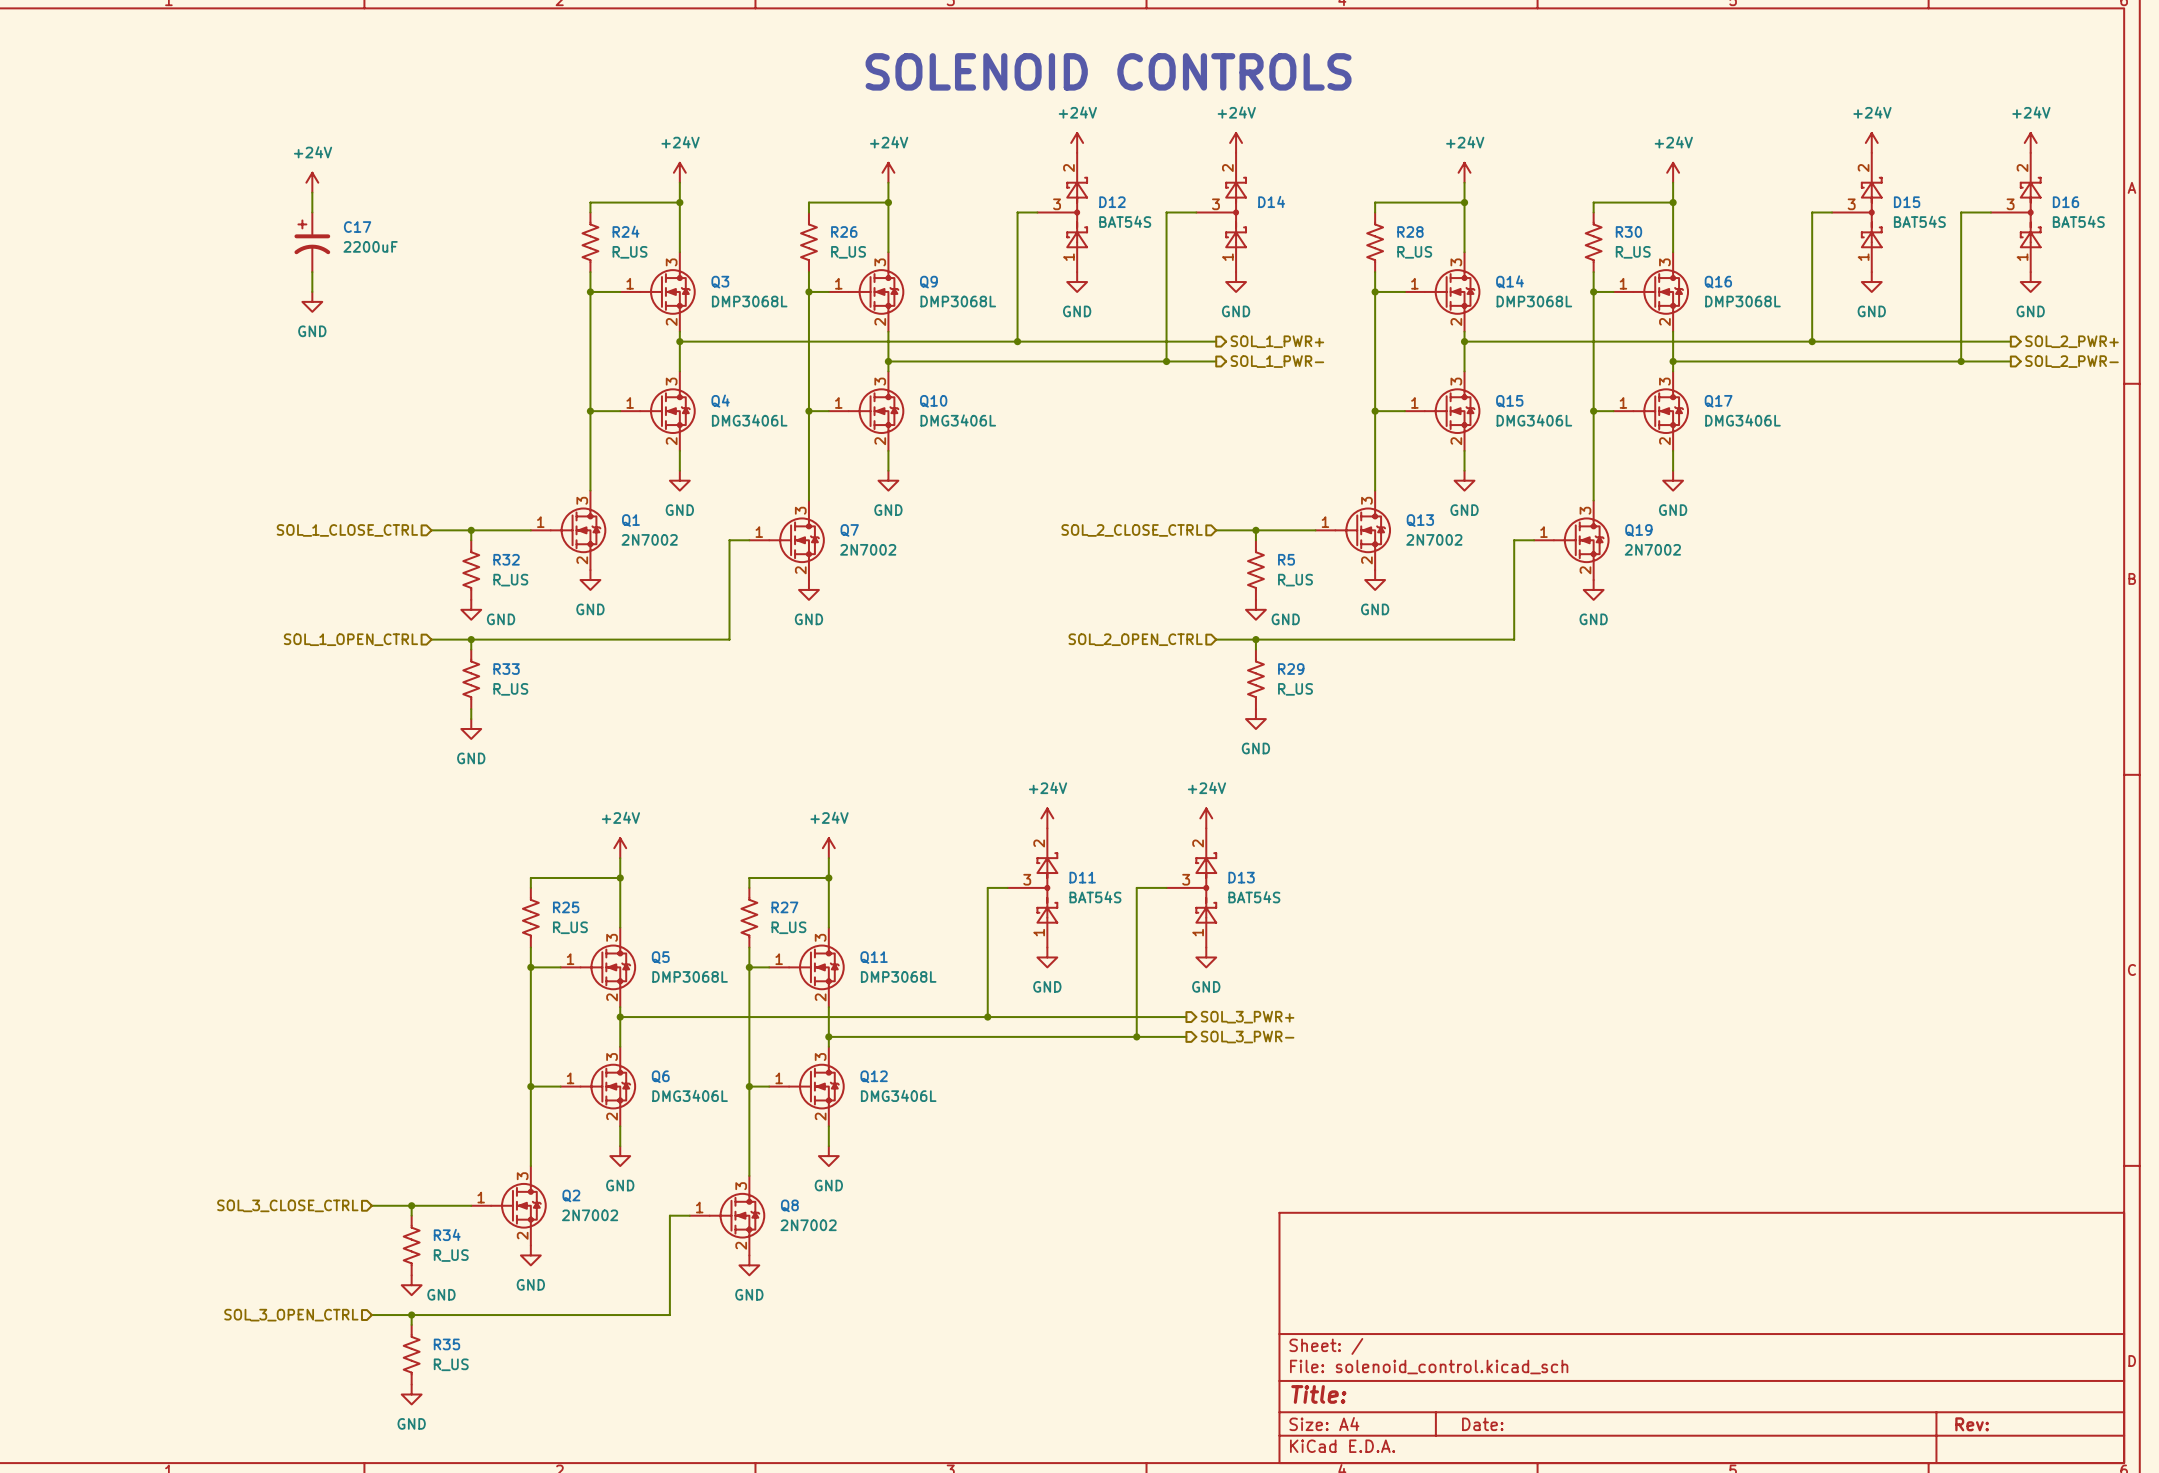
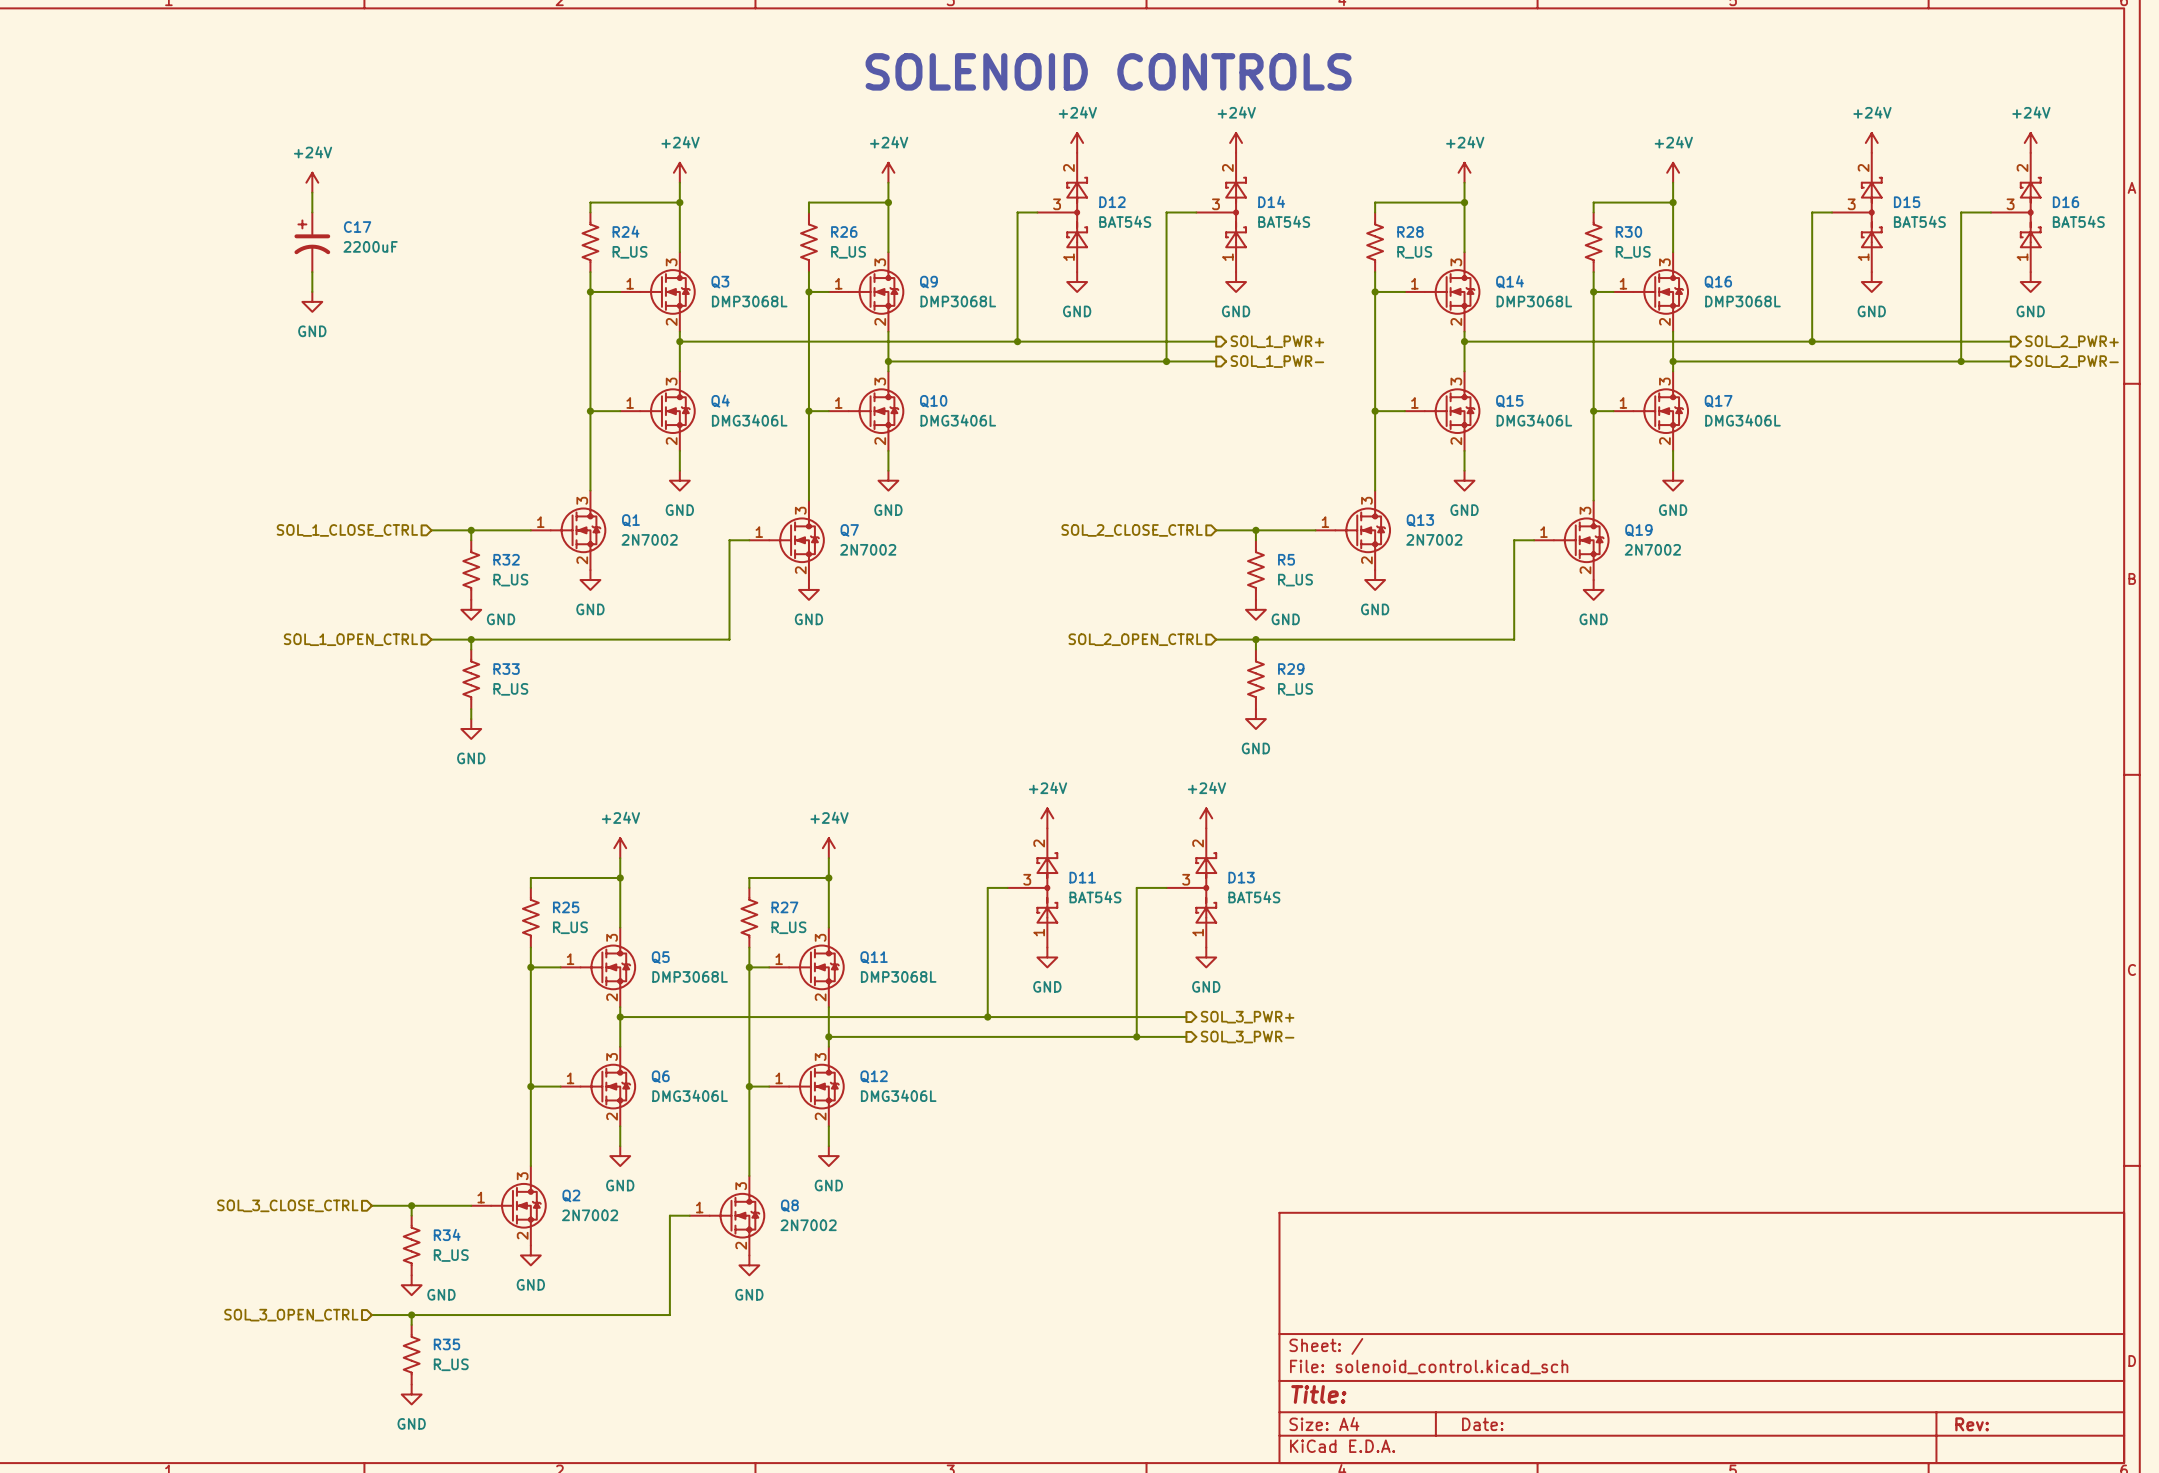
D14 value: none -> BAT54S (1284, 221)

